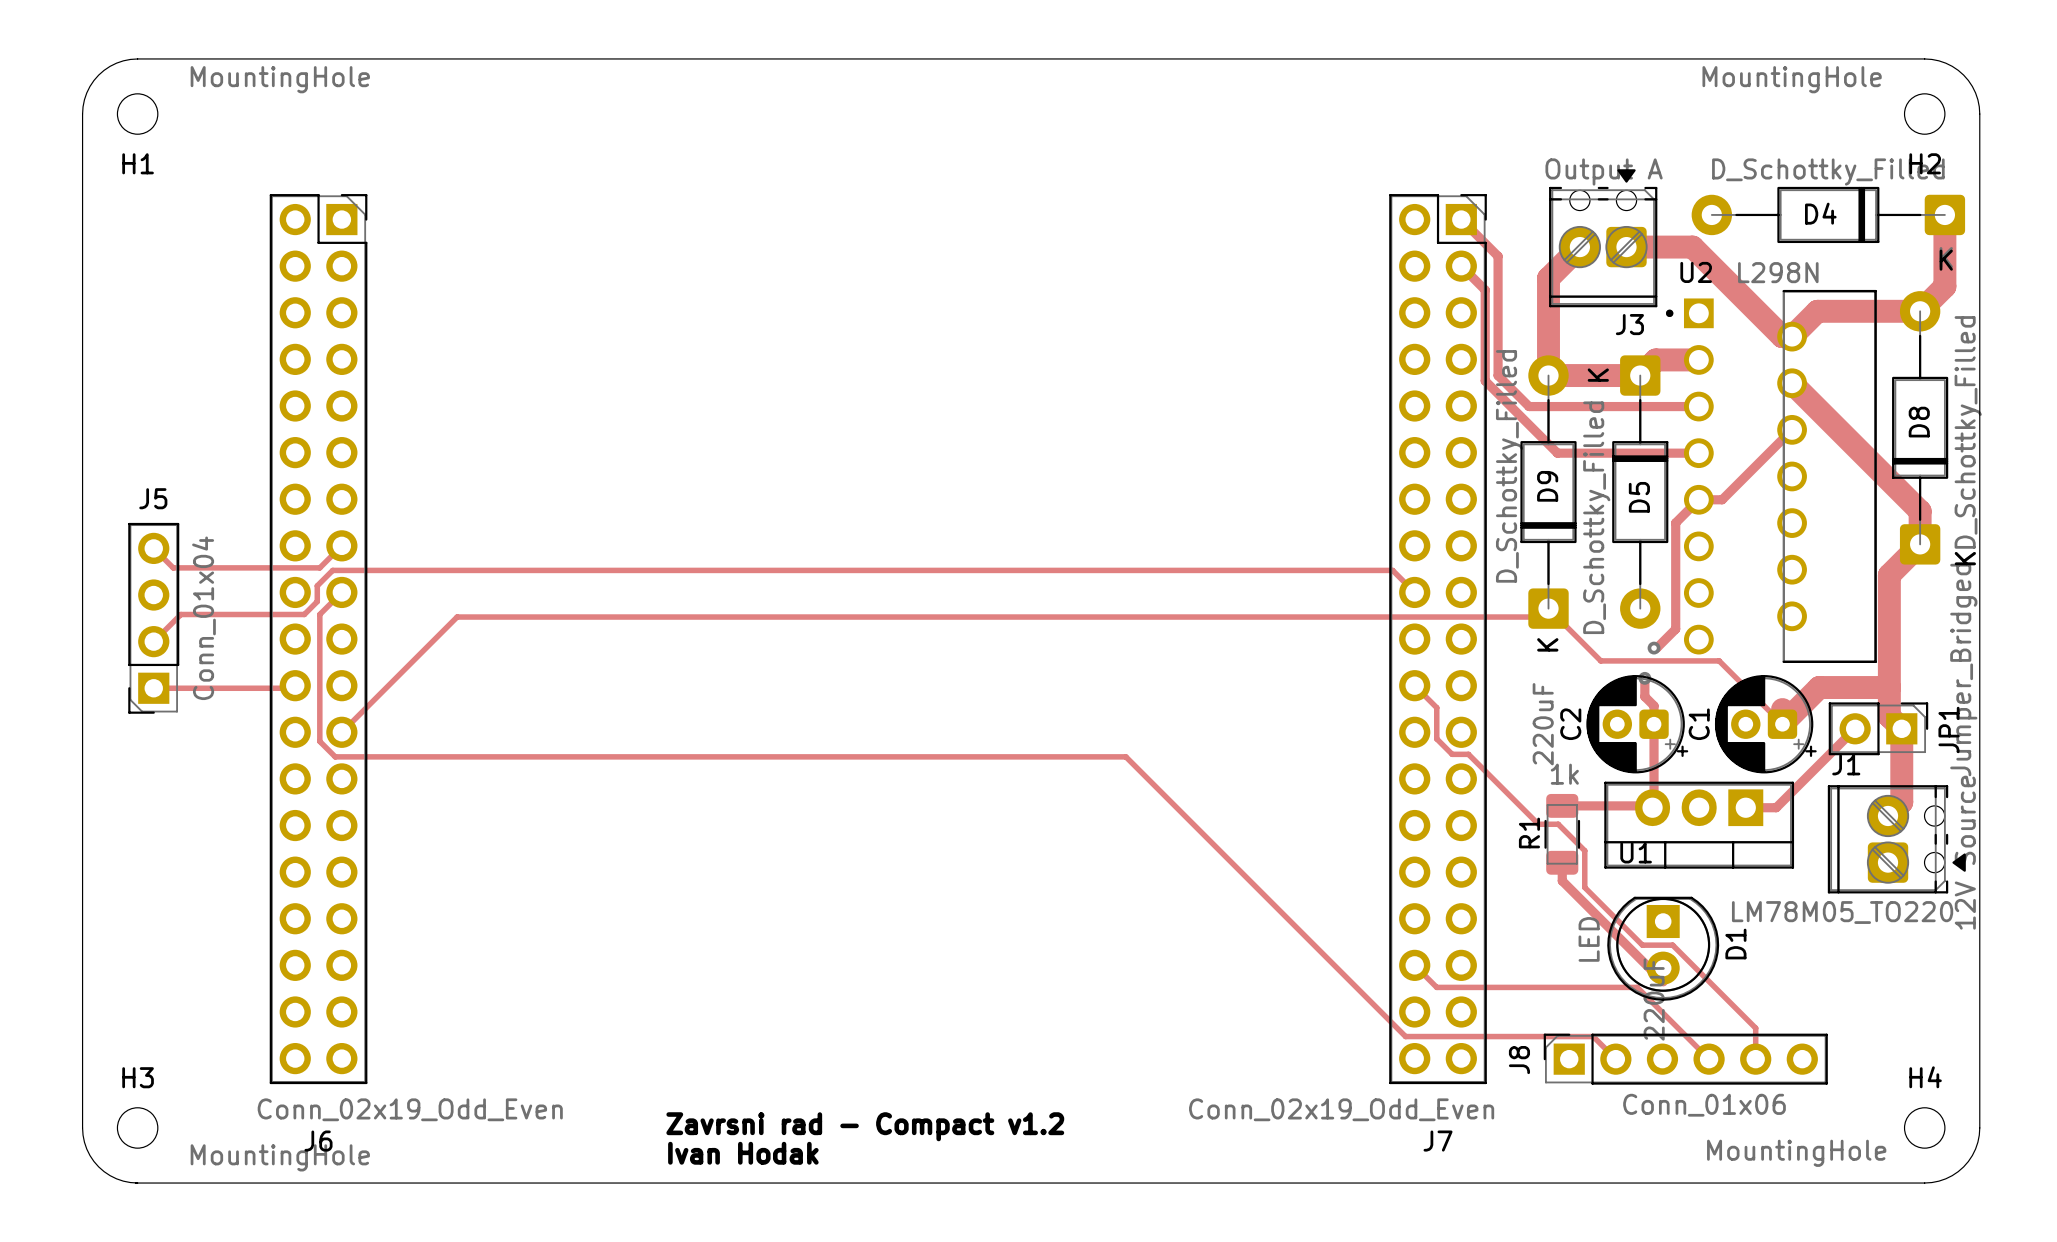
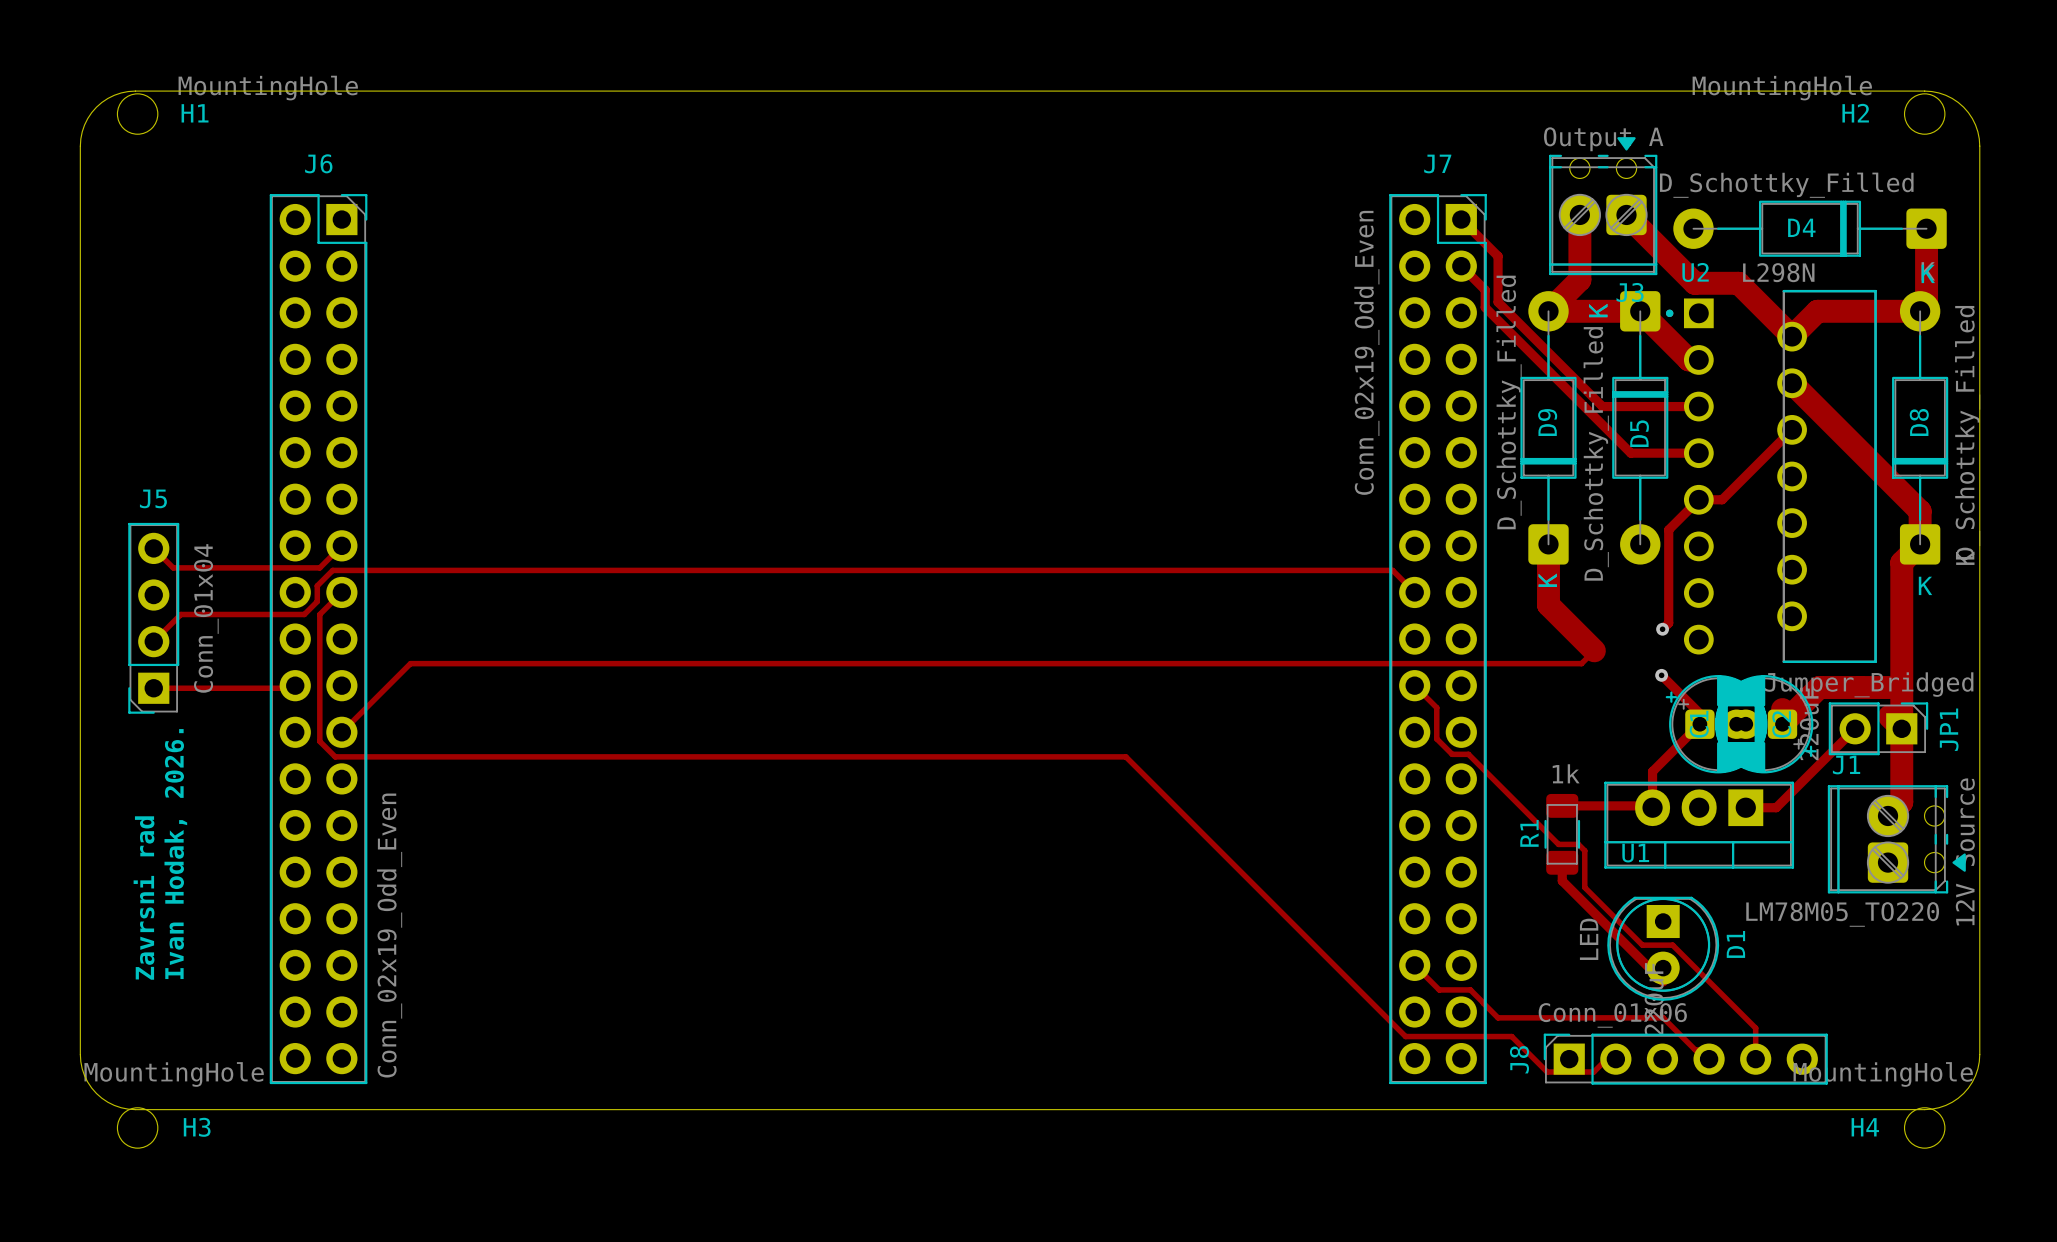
H1 value position: MountingHole (280, 79) -> MountingHole (268, 88)
H2 value position: MountingHole (1792, 79) -> MountingHole (1782, 88)
board edge: (1979, 146) (1979, 106) (1972, 86) (1963, 75) (1952, 66) (1938, 60) (1924, 58) (137, 58) (123, 60) (110, 66) (98, 75) (89, 86) (84, 99) (82, 114) (82, 1127) (86, 1149) (98, 1166) (116, 1178) (137, 1183) -> (1979, 146) (1975, 125) (1963, 107) (1945, 95) (1924, 91) (135, 91) (114, 95) (96, 107) (84, 125) (80, 146) (80, 1054) (82, 1068) (87, 1082) (101, 1098) (114, 1105) (135, 1109) (1924, 1109) (1945, 1105) (1963, 1093) (1975, 1075) (1979, 1054)
H1 name position: H1 (138, 163) -> H1 (195, 113)
H2 name position: H2 (1925, 163) -> H2 (1855, 113)
D4 value position: D_Schottky_Filled (1828, 172) -> D_Schottky_Filled (1786, 185)
D4 position: (1828, 214) -> (1810, 228)
track: (1944, 214) (1944, 286) (1926, 304) -> (1926, 228) (1926, 304)
J3 position: (1603, 238) -> (1603, 206)
track: (1579, 247) (1548, 278) (1548, 375) (1640, 375) (1655, 359) (1688, 359) -> (1579, 214) (1579, 279) (1548, 311) (1640, 311) (1688, 359)
track: (1626, 247) (1692, 247) (1782, 336) (1792, 336) -> (1626, 214) (1694, 283) (1738, 283) (1792, 336)
D8 footprint: [1892, 291, 1949, 565] -> [1892, 291, 1949, 565]
track: (1498, 302) (1498, 375) (1529, 406) (1602, 406) -> (1498, 302) (1602, 406)
track: (1485, 307) (1485, 380) (1557, 453) (1630, 453) -> (1485, 307) (1630, 453)
D9 position: (1548, 492) -> (1548, 427)
D5 position: (1640, 492) -> (1640, 427)
track: (1675, 522) (1675, 629) (1656, 648) (1654, 648) -> (1675, 522) (1668, 529) (1668, 623) (1662, 629)
track: (1901, 562) (1889, 575) (1889, 716) -> (1901, 562) (1901, 728)
via: none -> (1662, 629)
via: (1654, 648) -> none
track: (410, 663) (457, 617) (1540, 617) (1548, 608) (1600, 660) (1719, 660) (1782, 724) -> (410, 663) (1581, 663) (1594, 650) (1548, 604) (1548, 544)
JP1 value rotation: 0° (1963, 670) -> 90° clockwise (1869, 684)
track: none -> (1661, 675) (1699, 713) (1699, 724) (1652, 771) (1652, 807)
via: none -> (1661, 675)
track: (1644, 678) (1644, 696) (1654, 705) (1654, 806) -> none
via: (1644, 678) -> none
C2 rotation: 0° (1637, 724) -> 180° (1716, 724)
C2 position: (1637, 724) -> (1716, 724)
track: (1538, 824) (1558, 824) (1578, 844) -> (1538, 824) (1558, 844) (1578, 844)
text: none -> Ivan Hodak, 2026. (175, 854)
text: none -> Zavrsni rad (144, 898)
track: (1436, 987) (1637, 987) (1709, 1059) -> (1436, 987) (1439, 989) (1470, 989) (1483, 1002)
track: none -> (1483, 1003) (1498, 1017) (1663, 1017) (1695, 1049) (1709, 1049)
track: (1511, 1036) (1593, 1036) (1615, 1059) -> (1511, 1036) (1547, 1072) (1593, 1072) (1615, 1049)
board edge: (1979, 1054) (1979, 1127) (1975, 1149) (1968, 1161) (1958, 1171) (1945, 1178) (1931, 1182) (135, 1183) -> none
H3 name position: H3 (138, 1077) -> H3 (197, 1127)
H4 name position: H4 (1925, 1077) -> H4 (1865, 1127)
J8 value position: Conn_01x06 (1704, 1105) -> Conn_01x06 (1612, 1015)
J6 value rotation: 0° (410, 1109) -> 90° counterclockwise (389, 935)
J7 value rotation: 0° (1341, 1109) -> 90° counterclockwise (1366, 352)
J7 value position: Conn_02x19_Odd_Even (1341, 1109) -> Conn_02x19_Odd_Even (1366, 352)
text: Zavrsni rad - Compact v1.2 (865, 1126) -> none
J6 name position: J6 (318, 1141) -> J6 (318, 163)
J7 name position: J7 (1438, 1141) -> J7 (1437, 163)
text: Ivan Hodak (743, 1153) -> none
H4 value position: MountingHole (1796, 1153) -> MountingHole (1883, 1074)
H3 value position: MountingHole (280, 1157) -> MountingHole (174, 1074)

